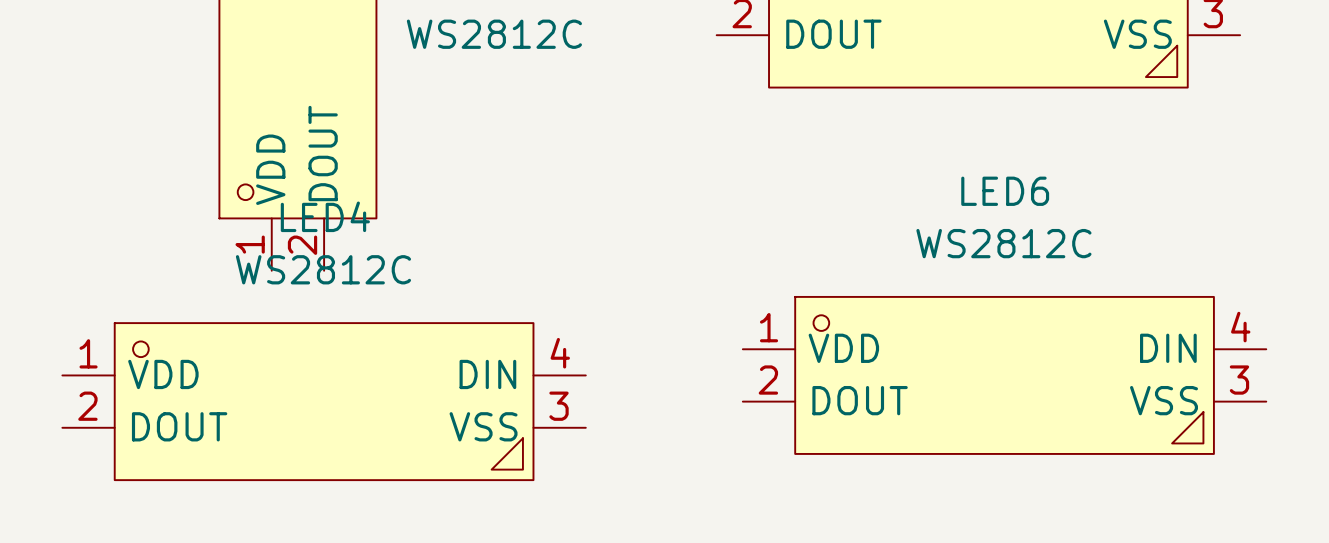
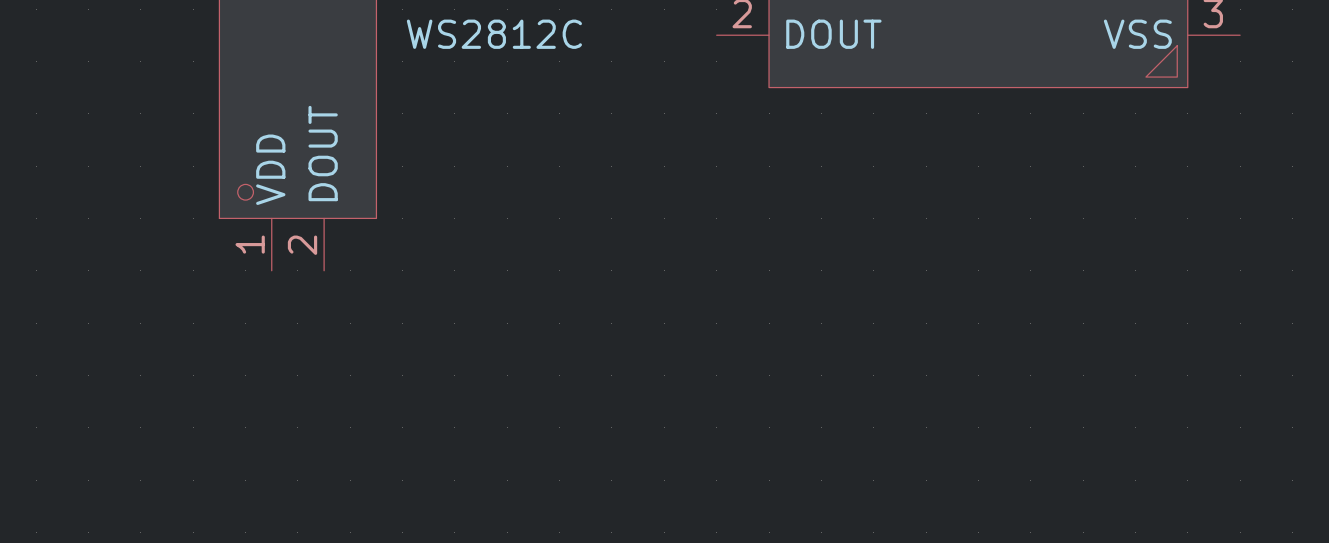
LED6: WS2812C (1004, 375) -> none
LED4: WS2812C (324, 401) -> none

